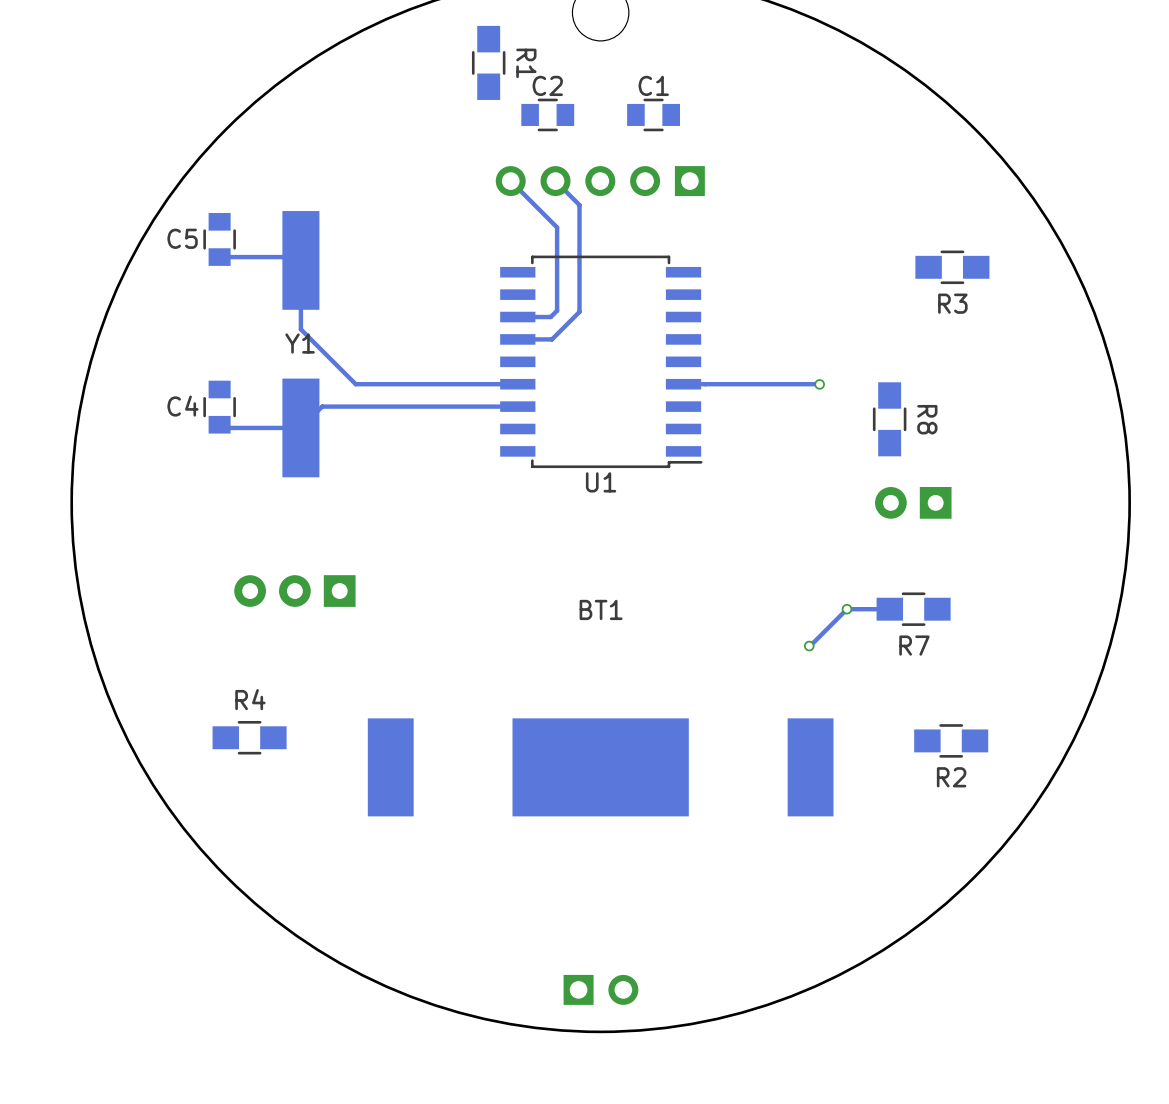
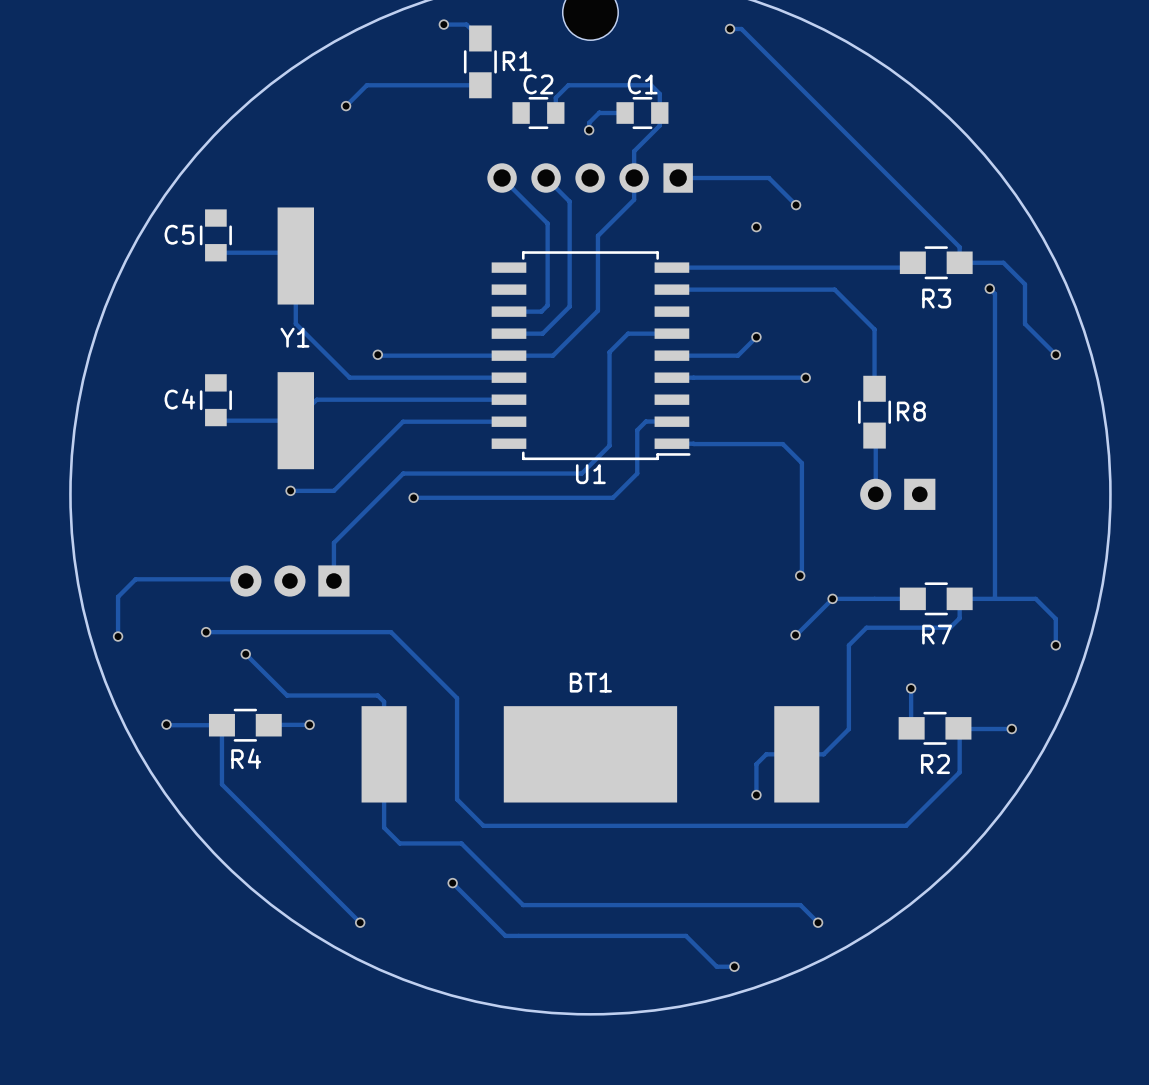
track: none -> (443, 24) (466, 24) (480, 38)
via: none -> (443, 24)
track: none -> (730, 28) (741, 28) (959, 247) (959, 262) (1003, 262) (1025, 284) (1025, 323) (1055, 354)
via: none -> (730, 28)
R1 name rotation: 0° (526, 63) -> 90° counterclockwise (517, 61)
track: none -> (480, 85) (366, 85) (346, 106)
via: none -> (346, 106)
track: none -> (555, 113) (555, 97) (568, 85) (651, 85) (659, 93) (659, 125) (634, 151) (634, 199) (597, 235) (597, 310) (553, 355) (377, 354)
track: none -> (625, 113) (599, 112) (589, 122) (589, 130)
via: none -> (589, 130)
track: none -> (678, 178) (768, 178) (796, 205)
via: none -> (796, 205)
via: none -> (756, 227)
track: none -> (912, 262) (908, 267) (671, 267)
track: none -> (989, 288) (994, 293) (994, 598)
via: none -> (989, 288)
track: none -> (671, 289) (834, 289) (874, 329) (874, 388)
track: none -> (671, 333) (628, 333) (609, 352) (609, 445) (581, 473) (403, 473) (333, 542) (333, 581)
track: none -> (756, 337) (737, 355) (671, 355)
via: none -> (756, 337)
via: none -> (377, 354)
via: none -> (1055, 354)
R8 name rotation: 0° (927, 419) -> 90° counterclockwise (911, 411)
track: none -> (508, 421) (403, 421) (333, 490) (290, 490)
track: none -> (659, 421) (645, 421) (637, 430) (637, 473) (612, 497) (413, 497)
track: none -> (874, 435) (875, 494)
track: none -> (671, 443) (782, 444) (801, 463) (801, 574)
via: none -> (290, 490)
via: none -> (413, 497)
via: none -> (800, 575)
track: none -> (245, 581) (244, 579) (135, 579) (118, 596) (118, 636)
BT1 name position: BT1 (601, 609) -> BT1 (590, 682)
R7 position: (913, 609) -> (936, 598)
track: none -> (912, 598) (874, 598)
track: none -> (206, 632) (391, 632) (457, 698) (457, 799) (483, 825) (906, 825) (959, 772) (959, 728) (1011, 728)
via: none -> (206, 632)
via: none -> (118, 636)
track: none -> (1055, 645) (1055, 618) (1035, 598) (959, 598) (959, 618) (950, 627) (866, 627) (848, 645) (848, 729) (823, 754) (766, 754) (756, 764) (756, 795)
via: none -> (1055, 645)
track: none -> (245, 654) (287, 695) (377, 695) (384, 701) (384, 827) (399, 843) (461, 843) (523, 905) (800, 905) (818, 922)
via: none -> (245, 654)
R4 name position: R4 (250, 699) -> R4 (246, 758)
track: none -> (911, 688) (911, 728)
via: none -> (911, 688)
track: none -> (166, 724) (221, 725) (221, 784) (360, 922)
via: none -> (166, 724)
track: none -> (309, 724) (268, 725)
via: none -> (309, 724)
via: none -> (1011, 728)
via: none -> (756, 795)
track: none -> (452, 883) (505, 935) (686, 935) (716, 966) (734, 966)
via: none -> (452, 883)
via: none -> (360, 922)
via: none -> (818, 922)
via: none -> (734, 966)
part: (600, 989) -> none

